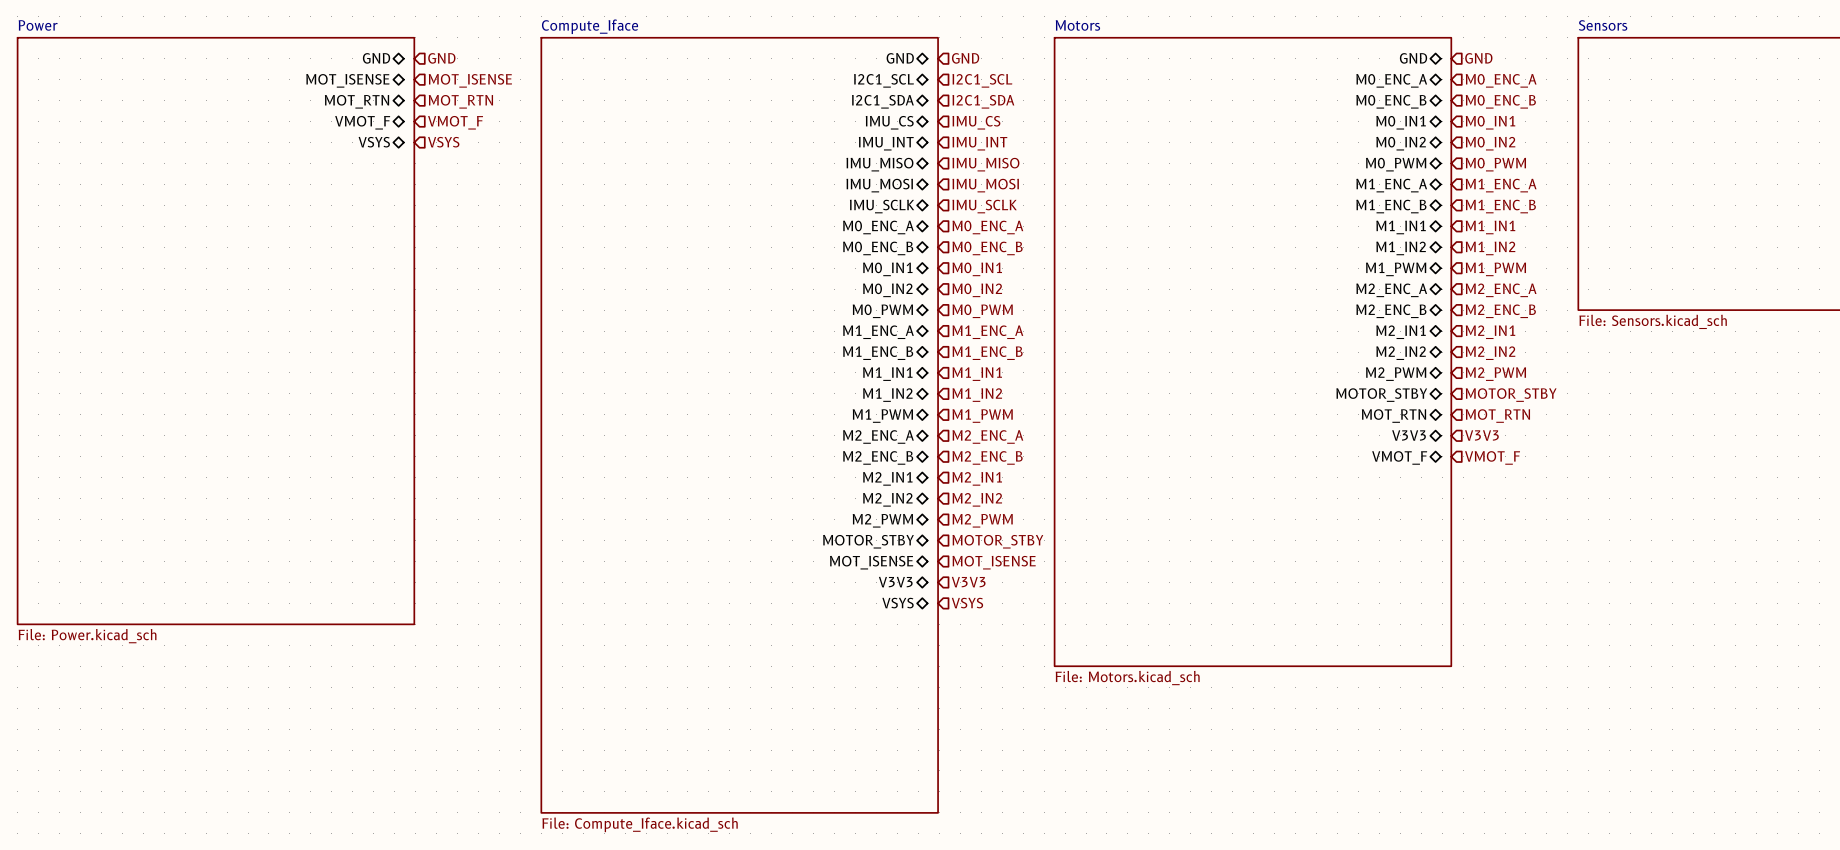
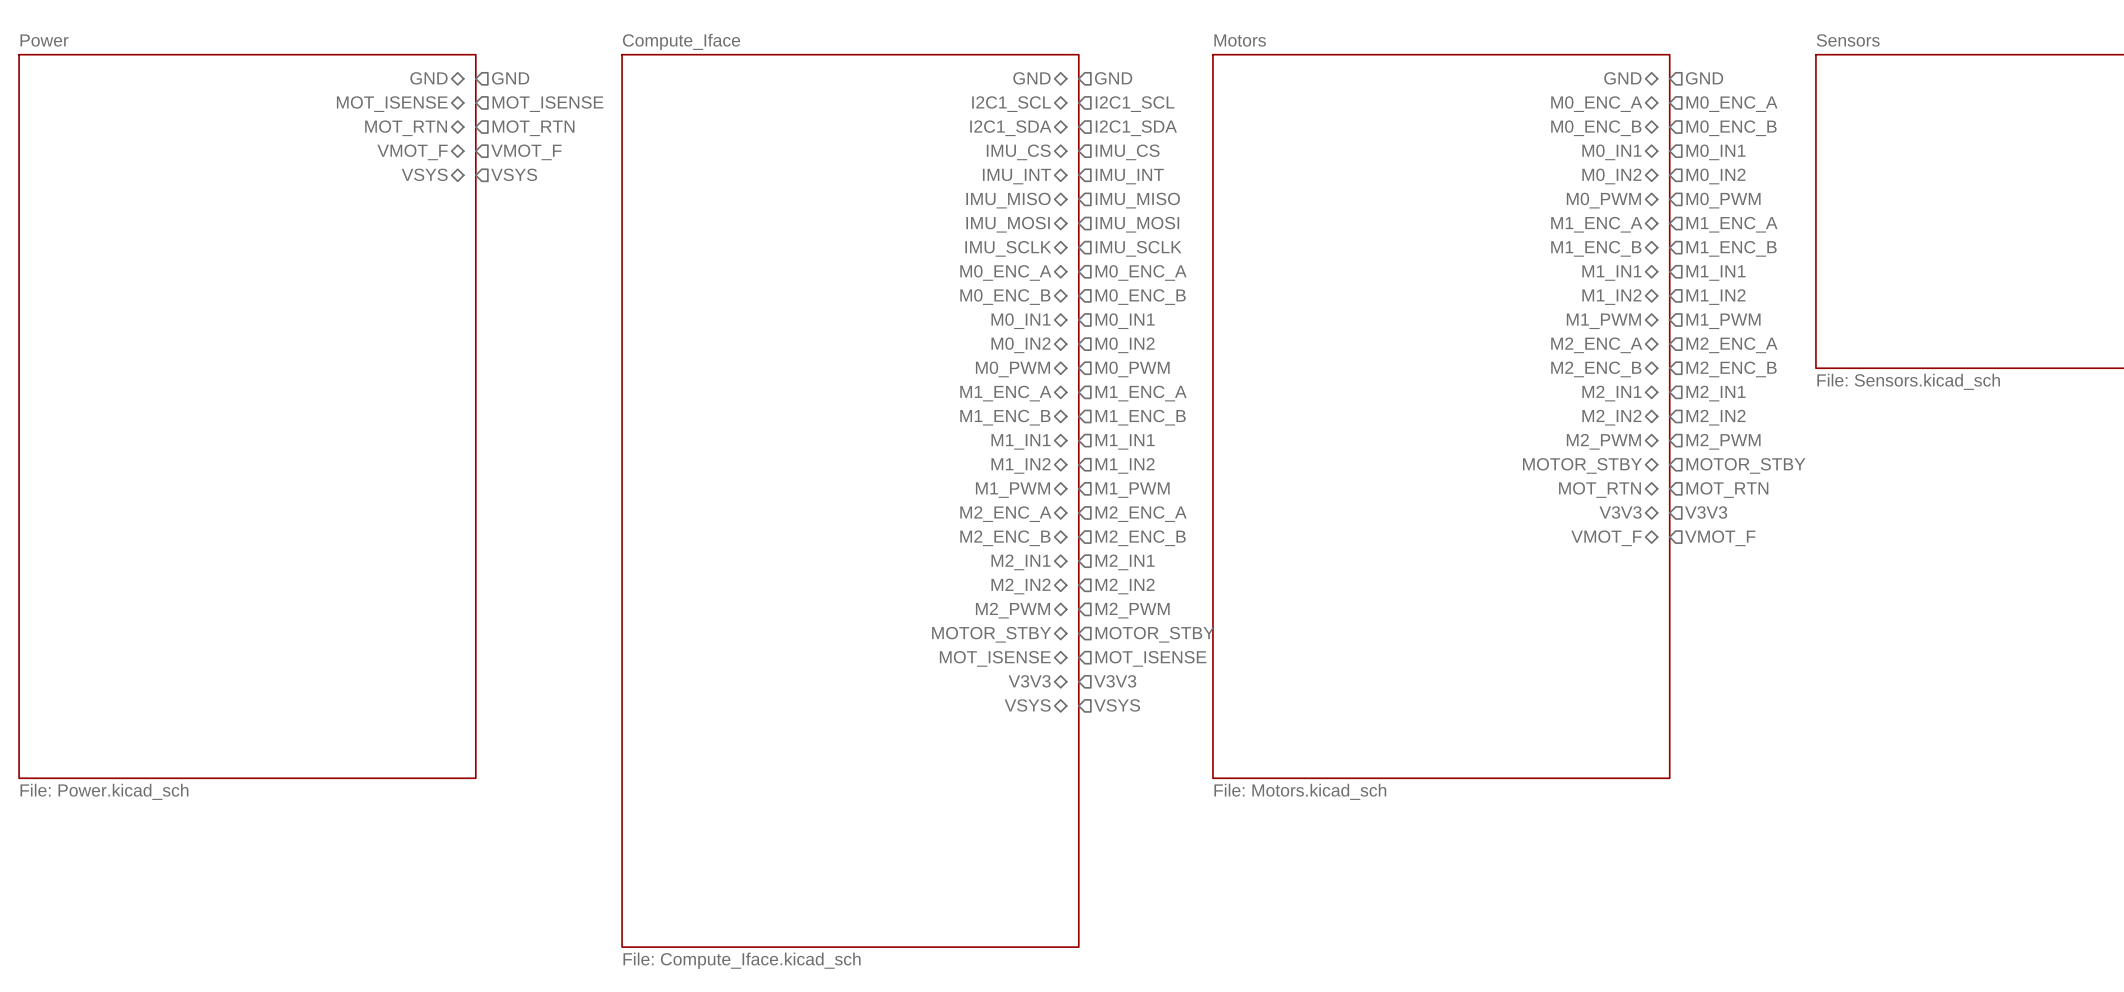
sheet Power: File: Power.kicad_sch (215, 331) -> none
sheet Power: none -> File: Power.kicad_sch (247, 416)

